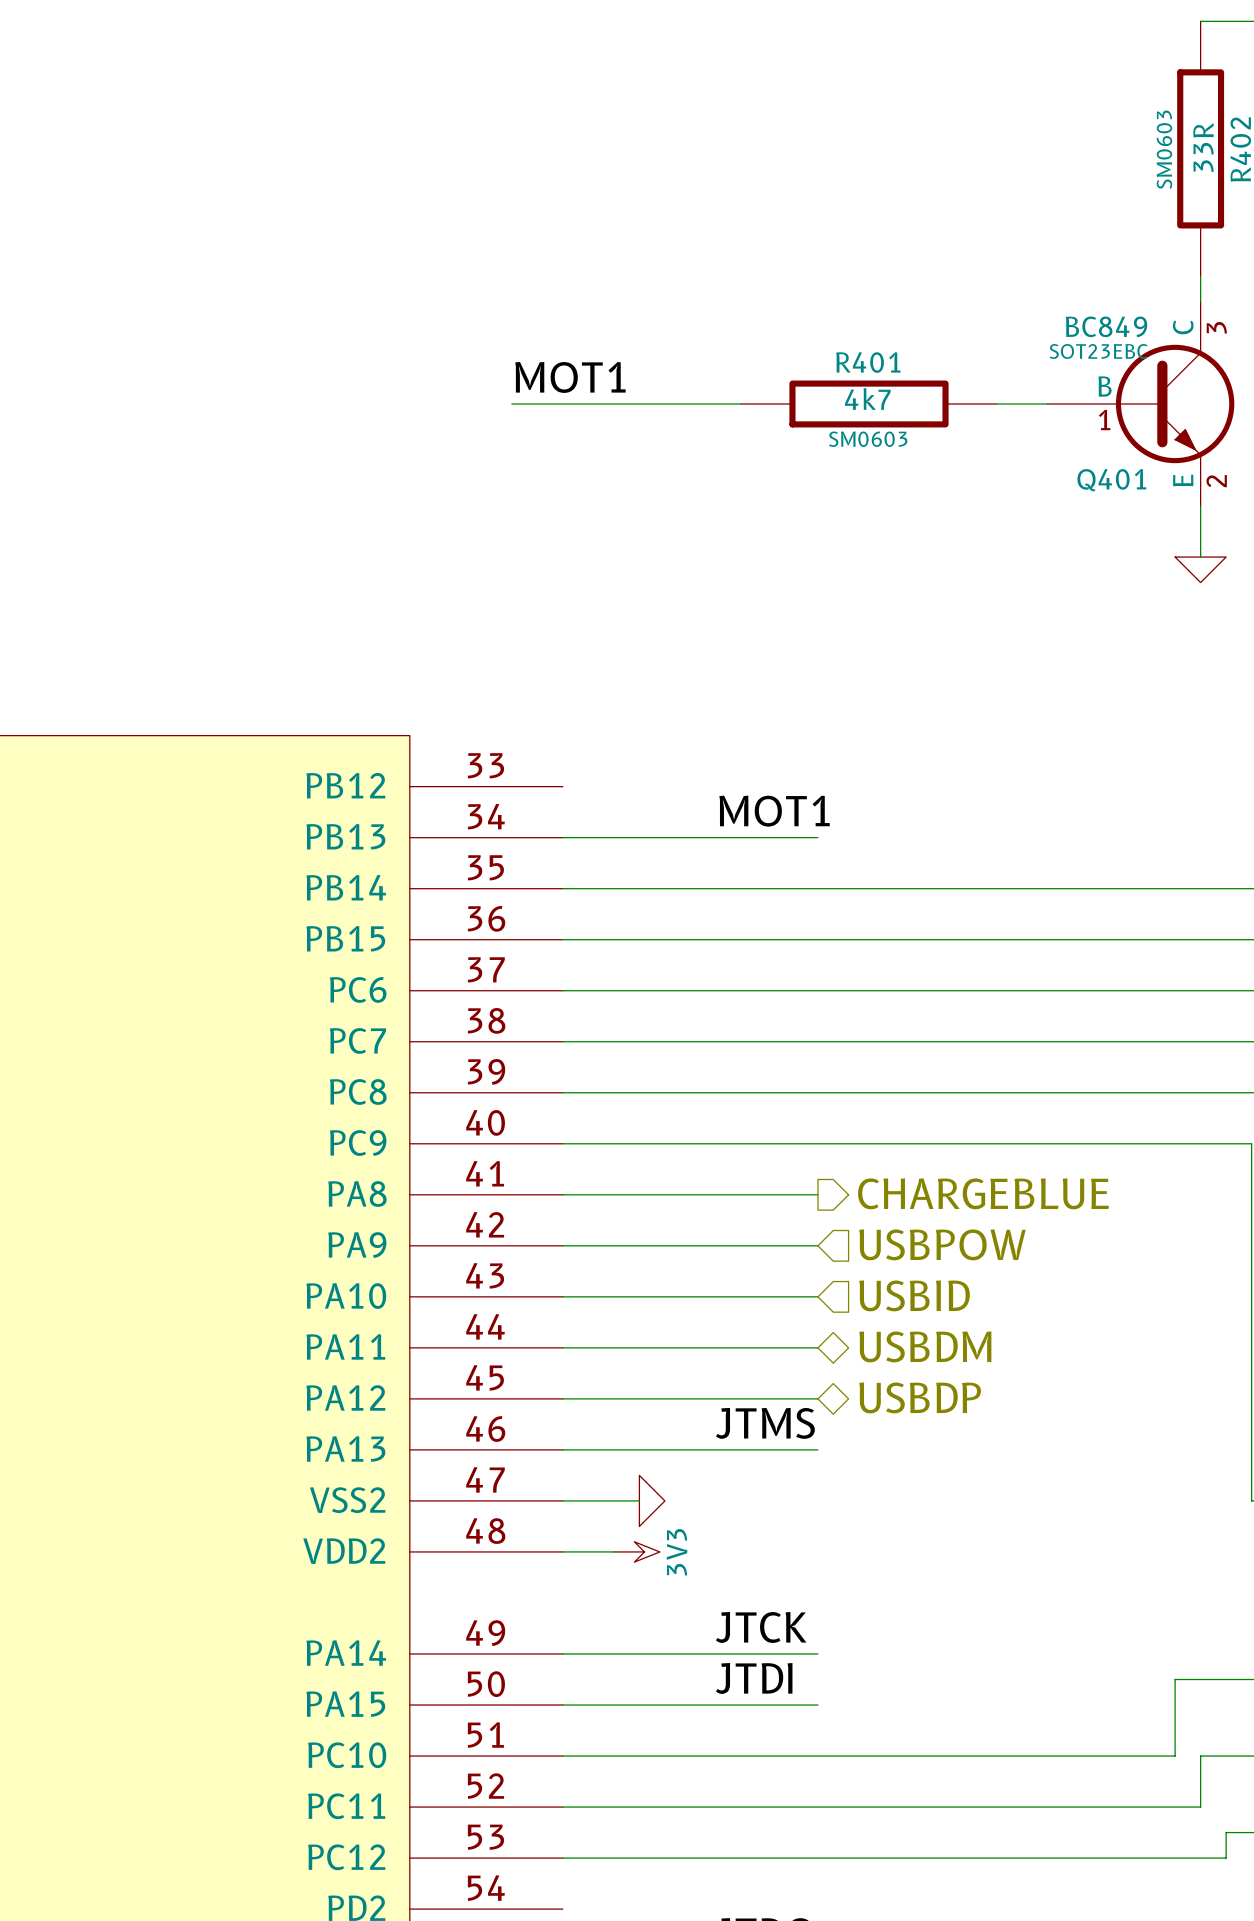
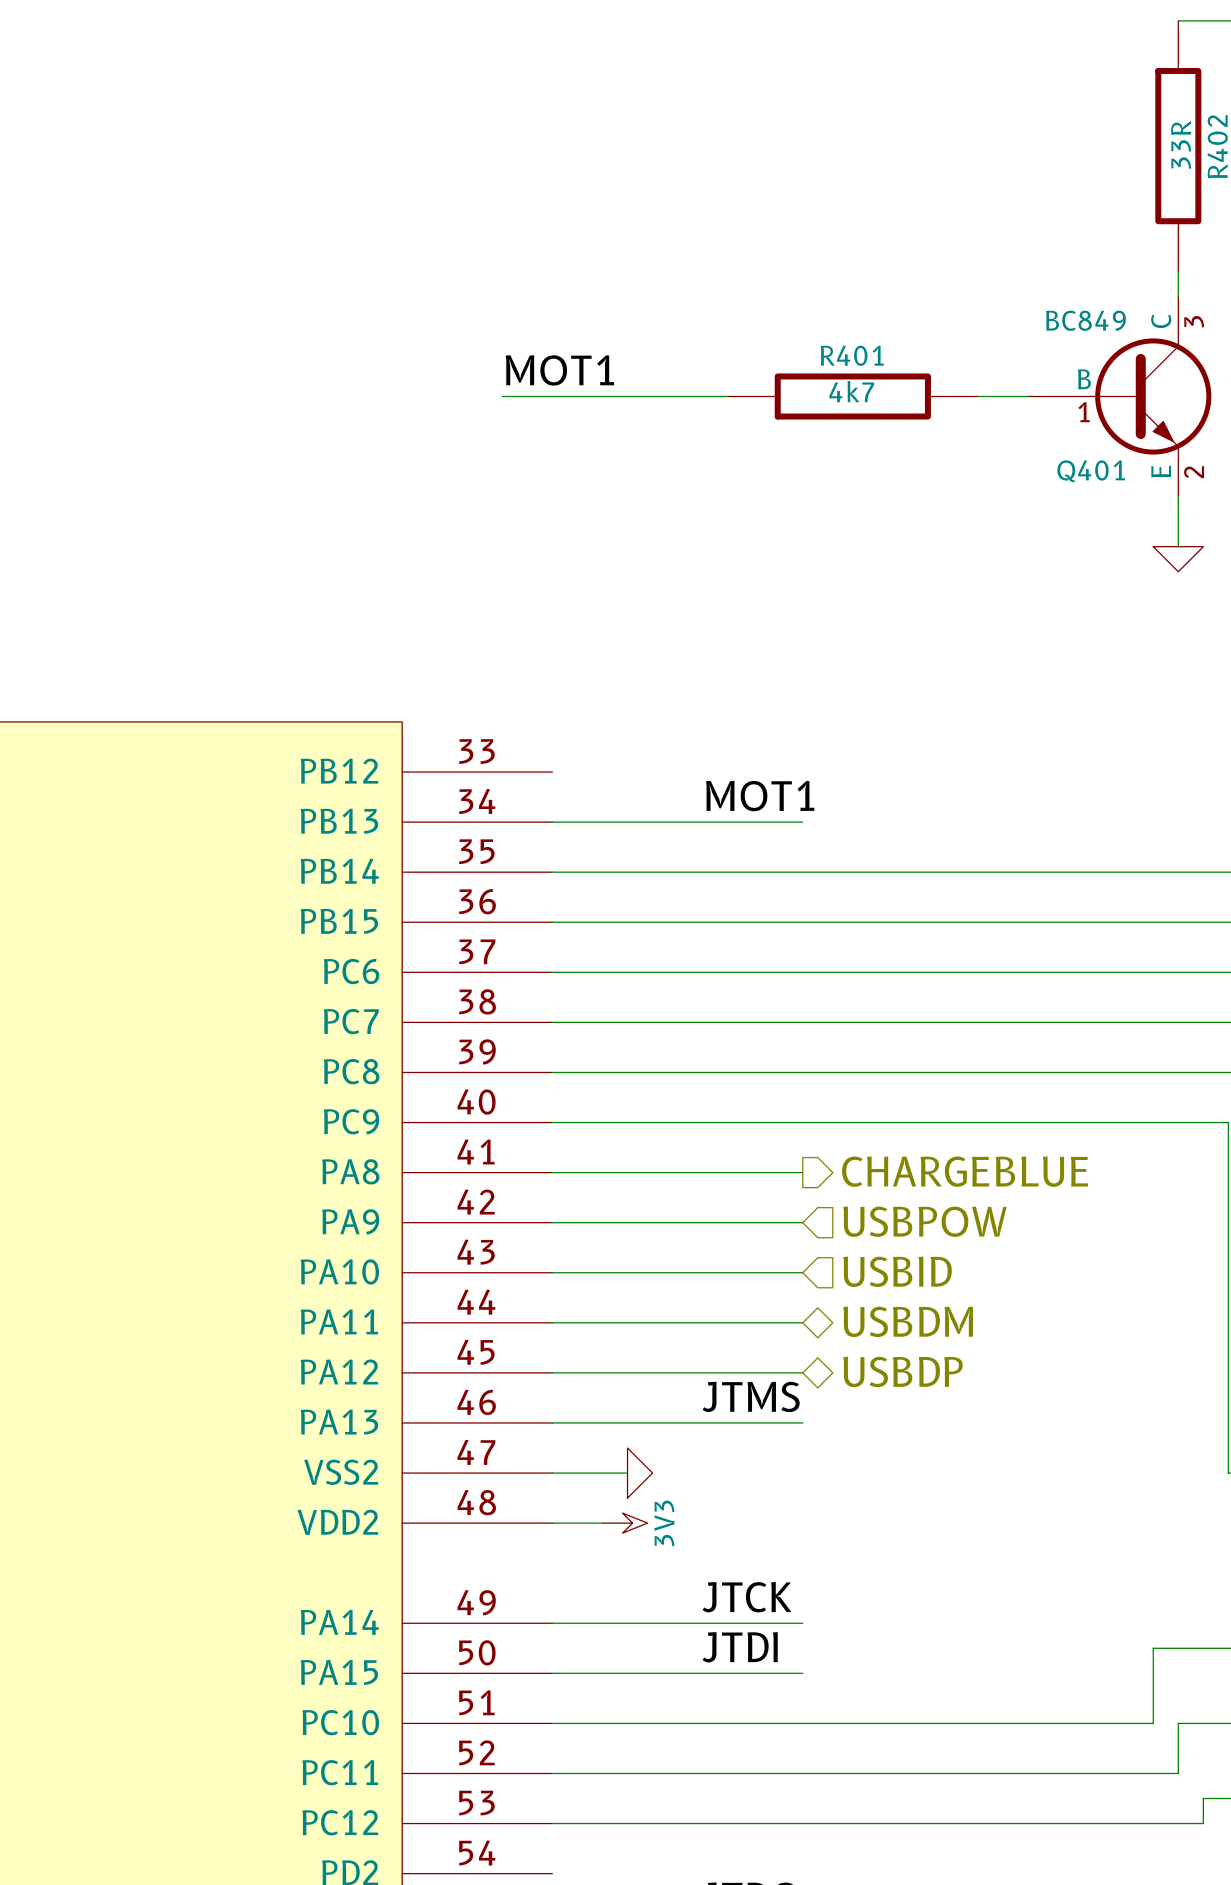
R402 text: SM0603 (1164, 149) -> none
Q401 text: SOT23EBC (1098, 351) -> none
R401 text: SM0603 (868, 439) -> none

